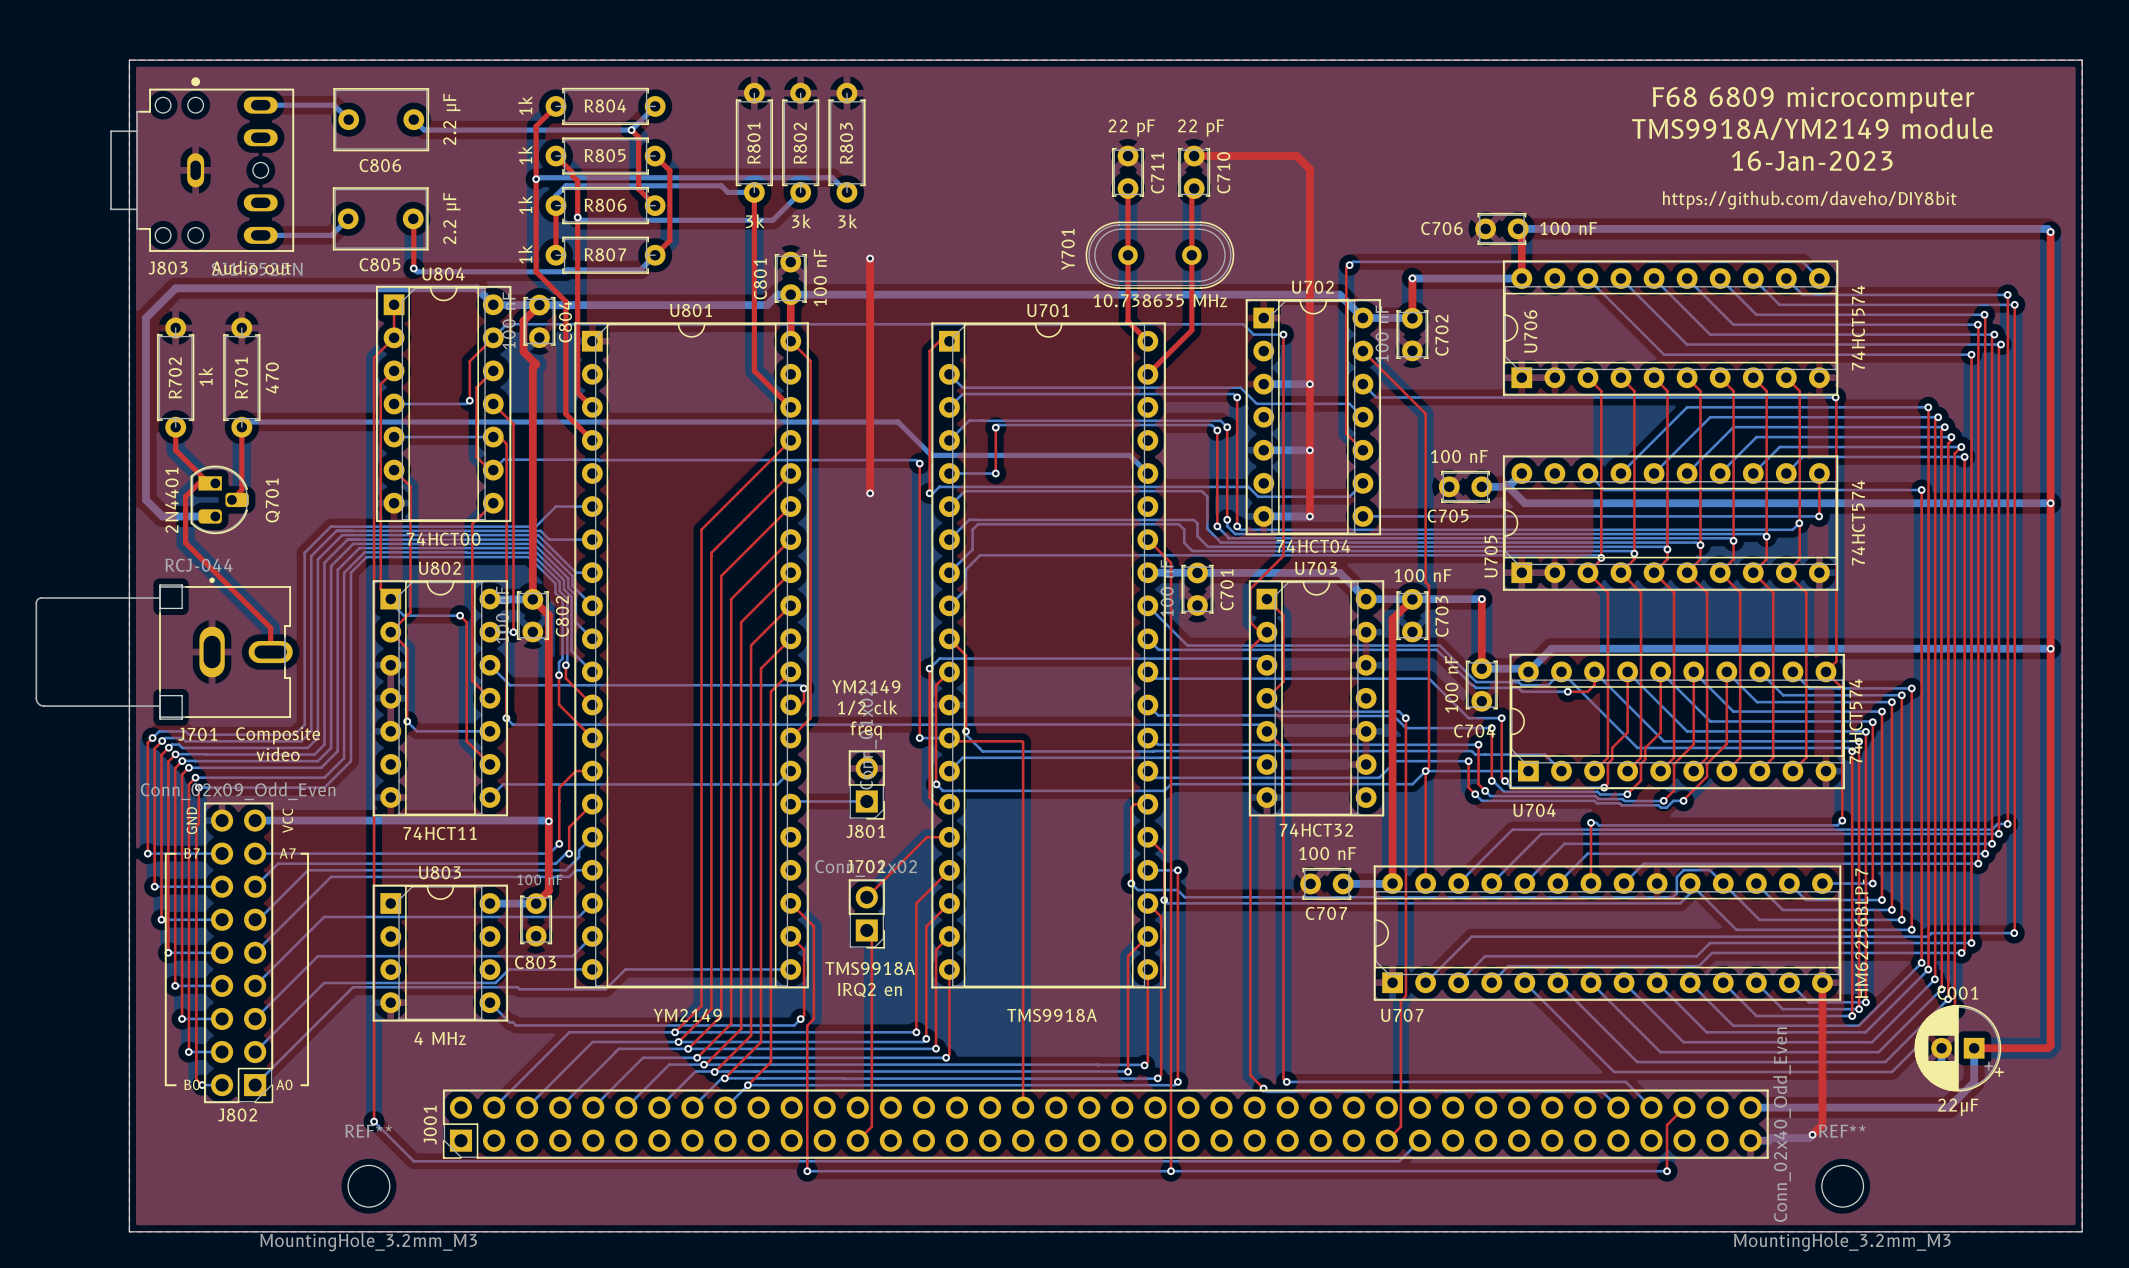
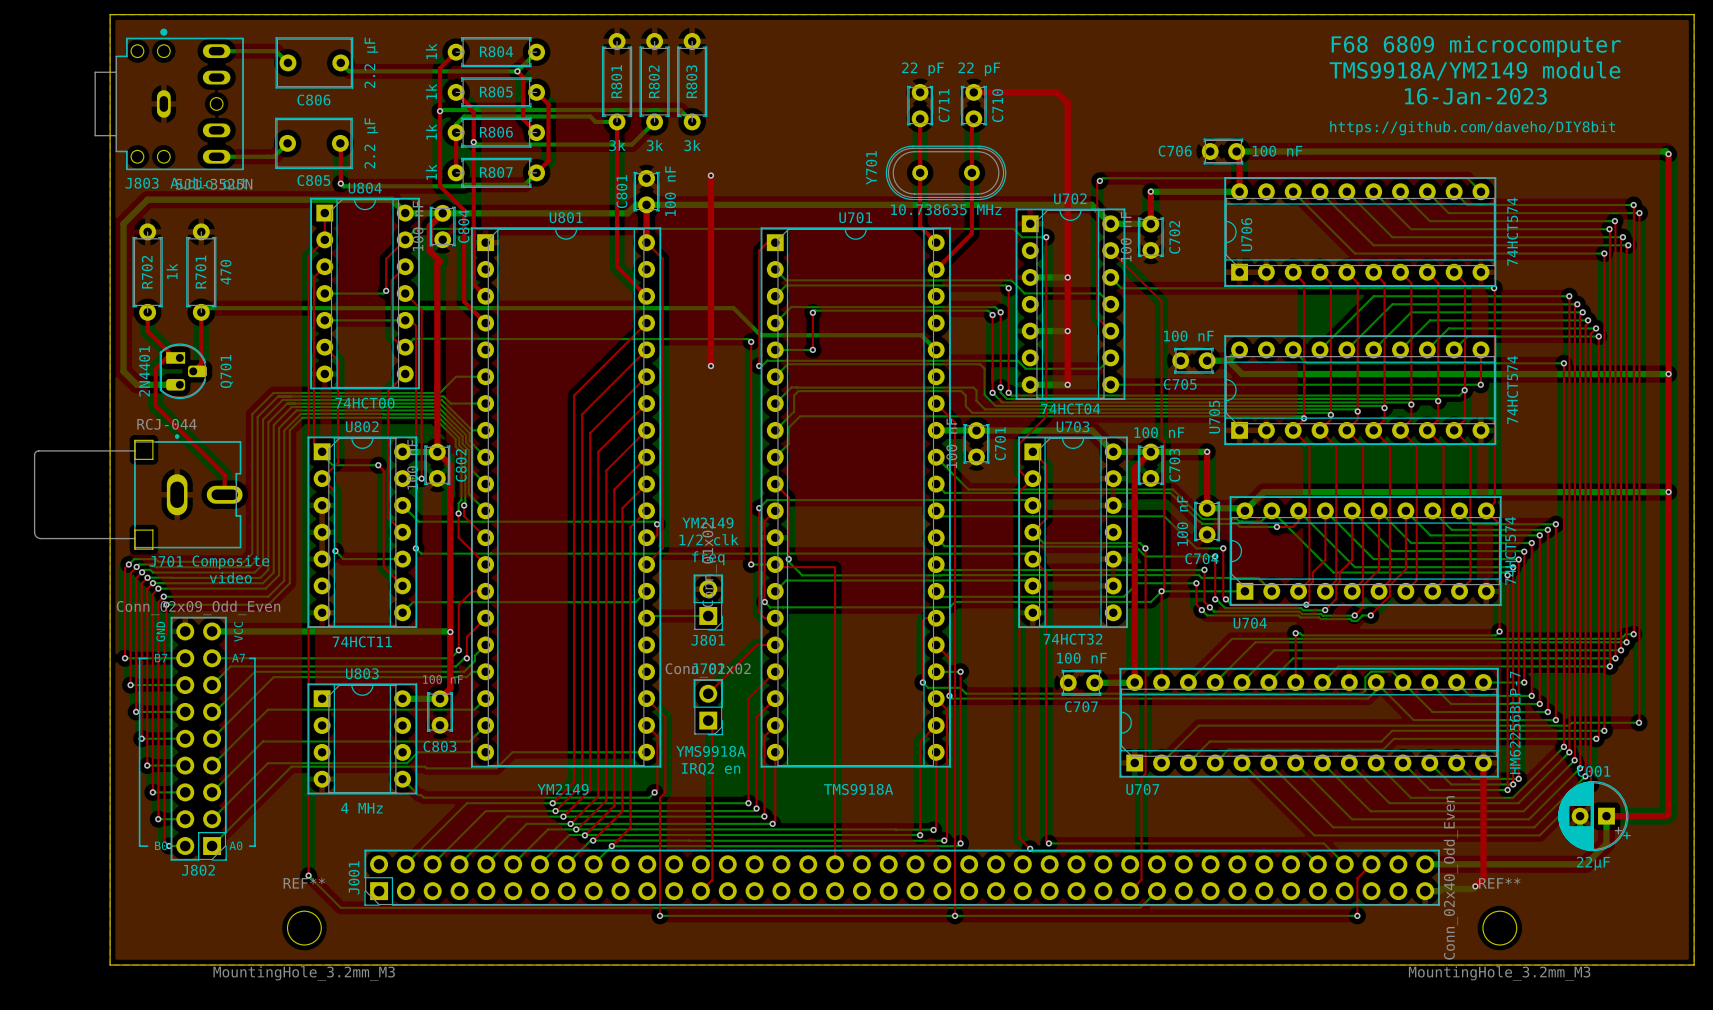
text: TMS9918A (870, 968) -> YMS9918A (710, 751)

